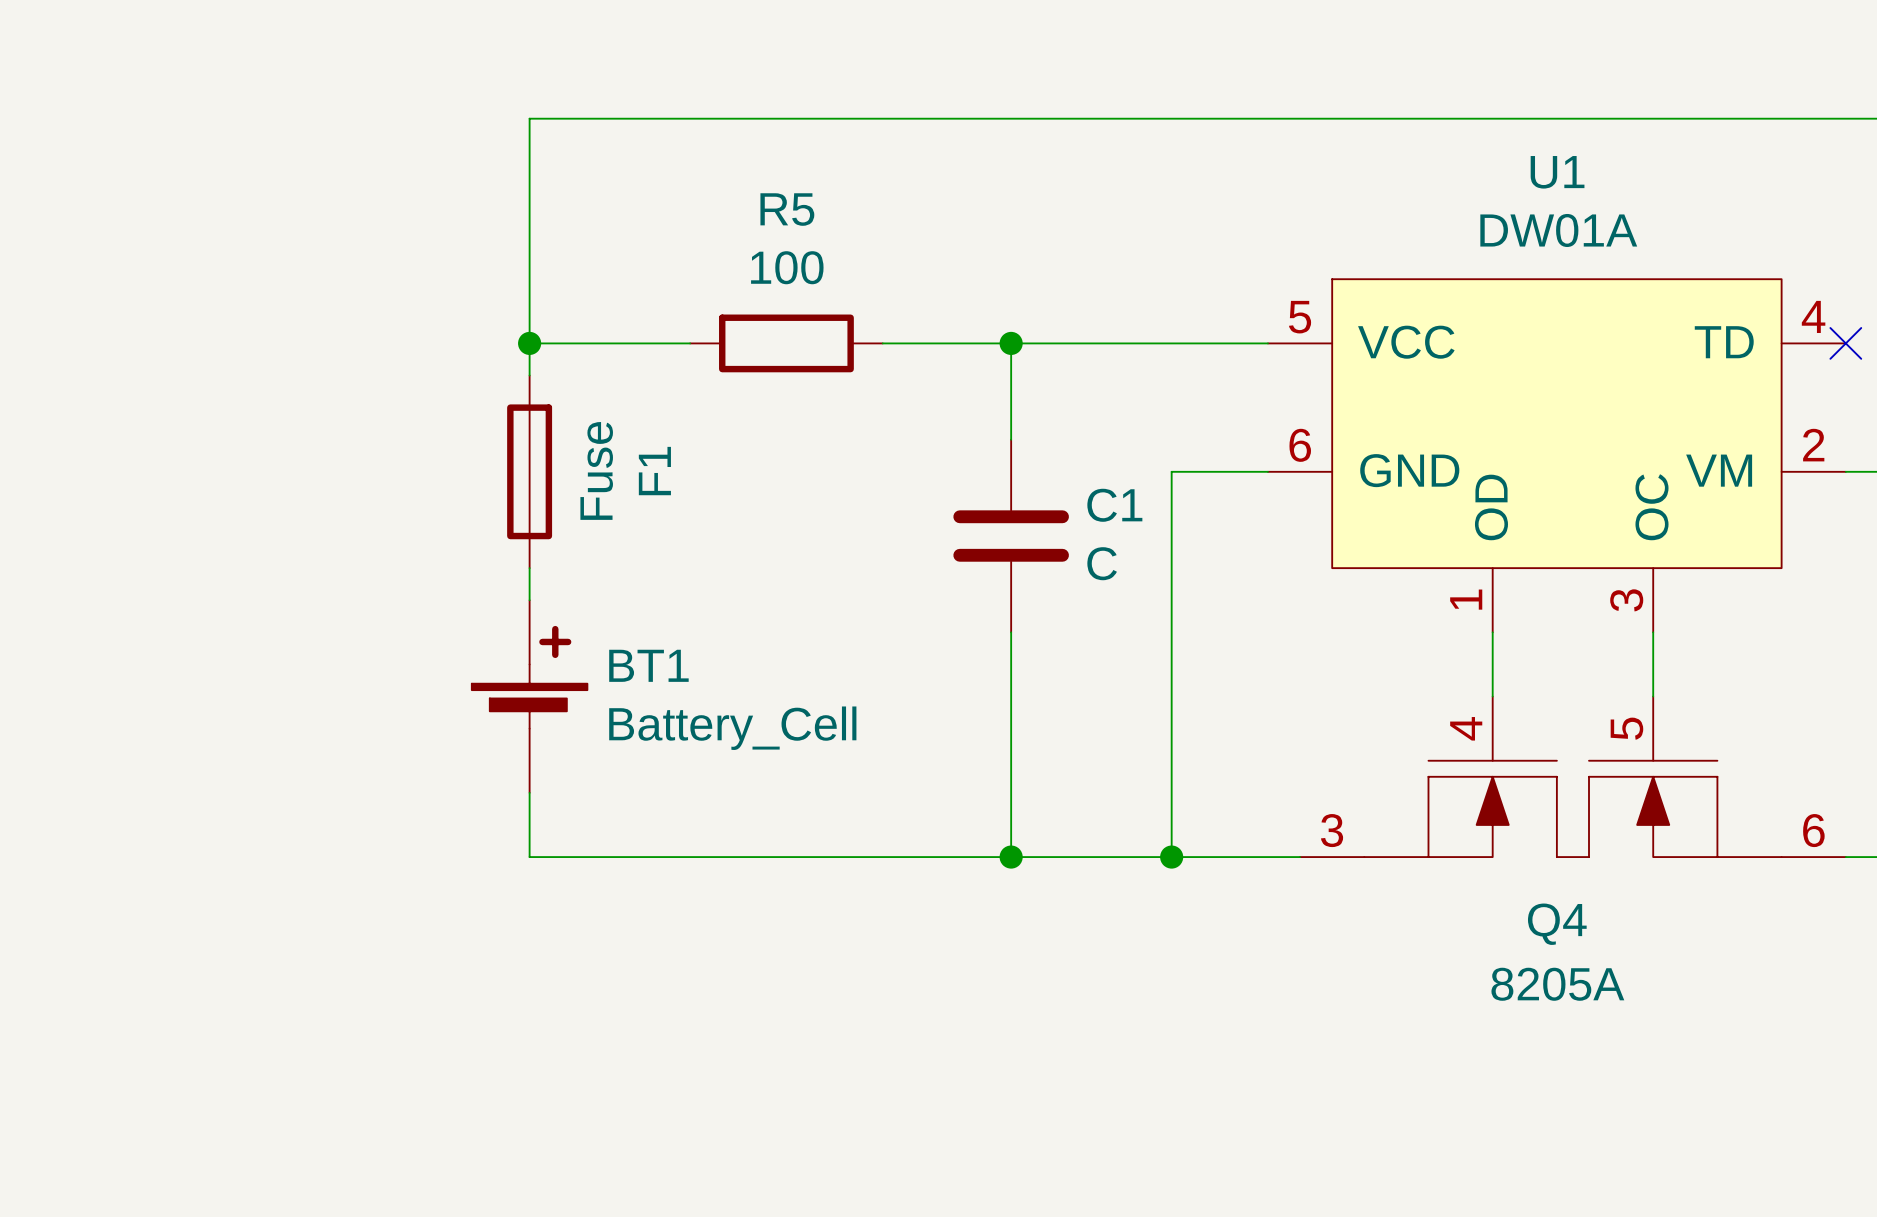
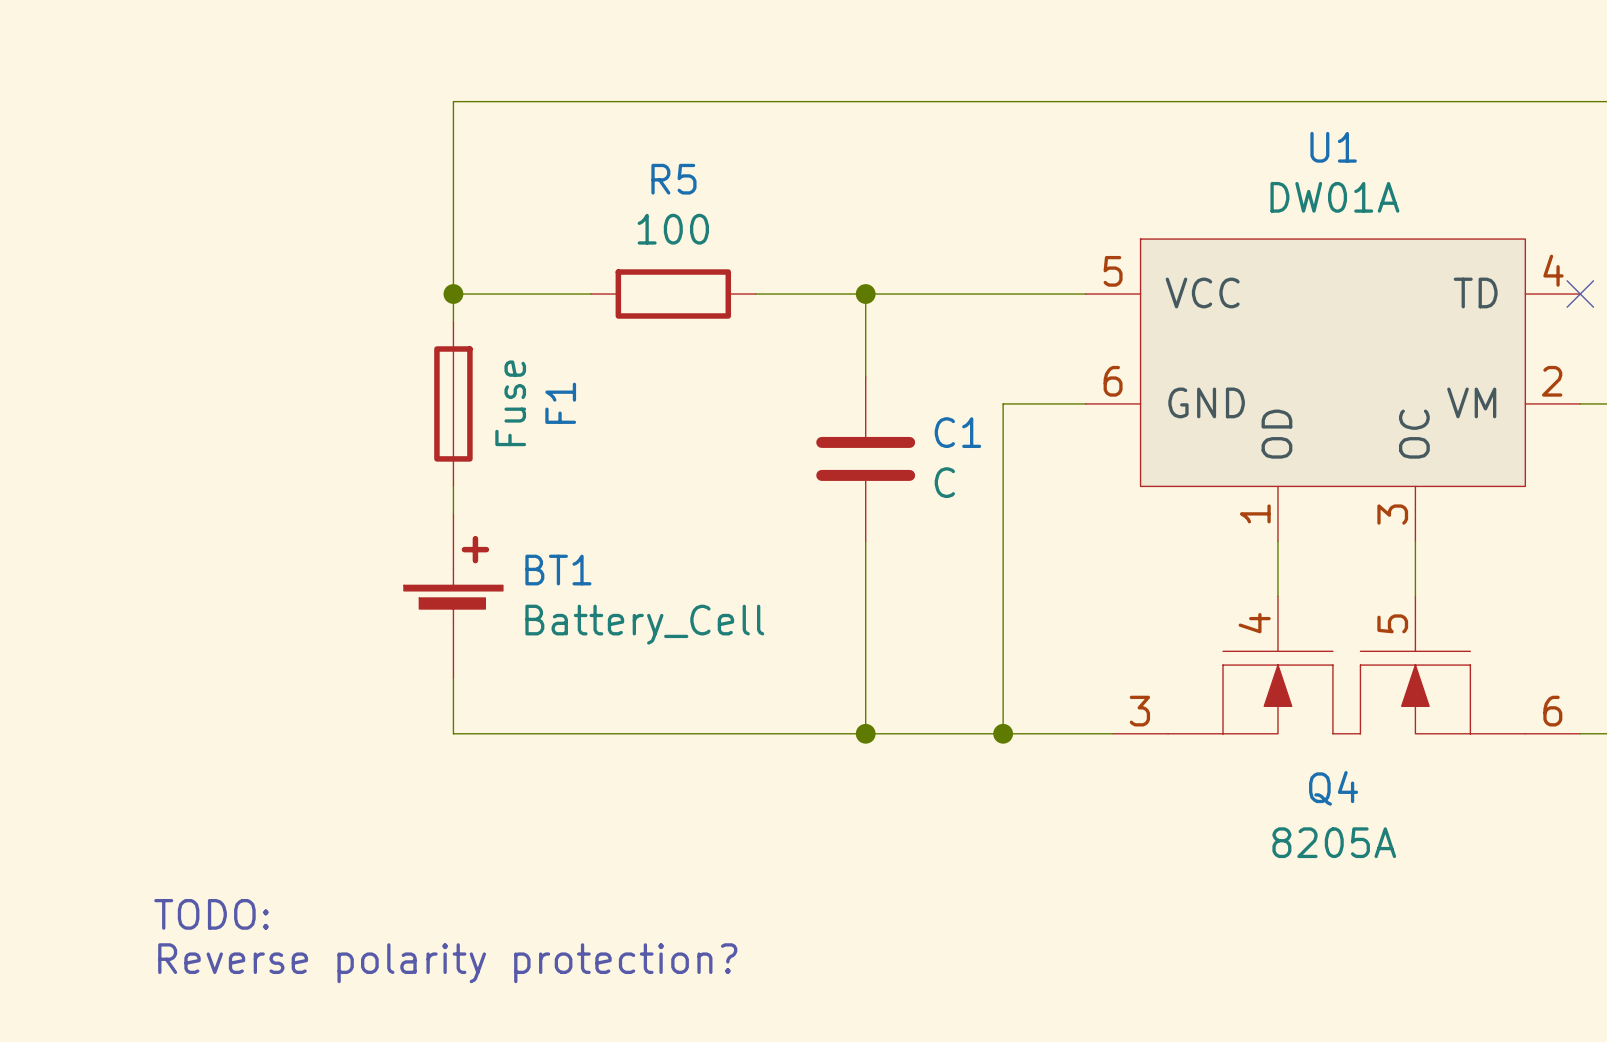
text: none -> TODO: (211, 914)
text: none -> Reverse polarity protection? (447, 963)

